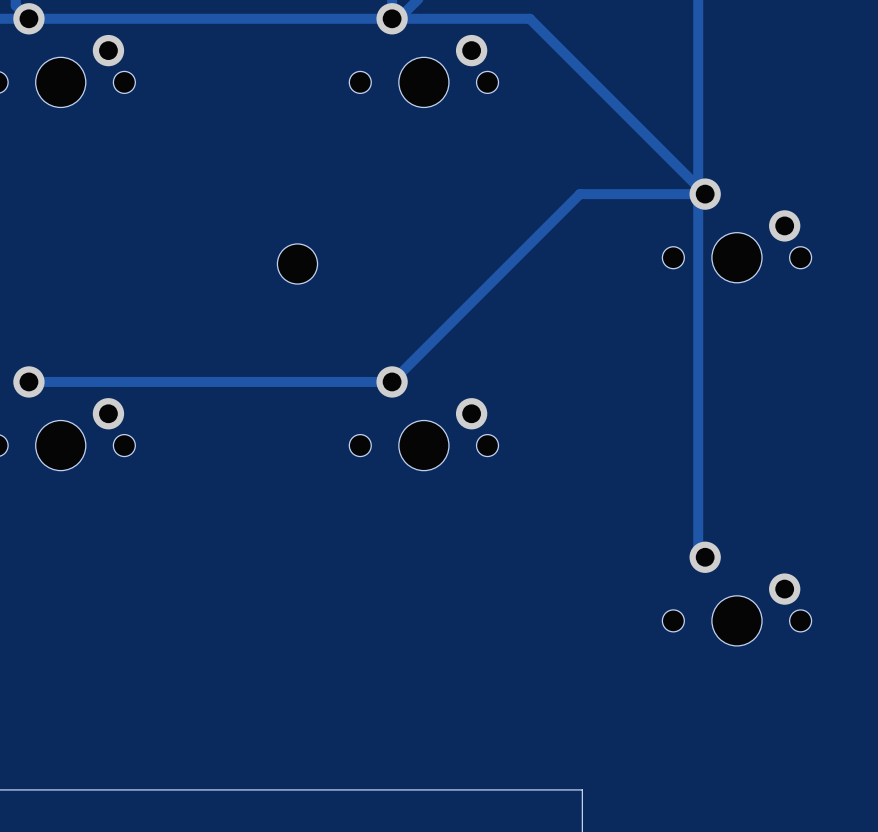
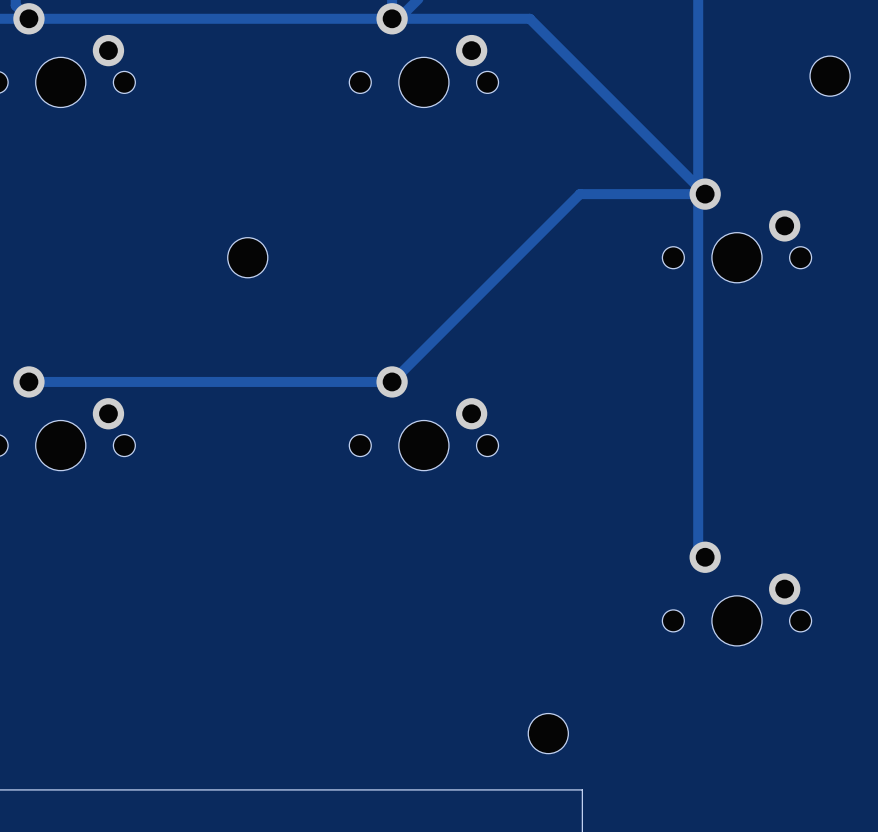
part: none -> (830, 76)
part position: (297, 263) -> (247, 257)
part: none -> (548, 733)

